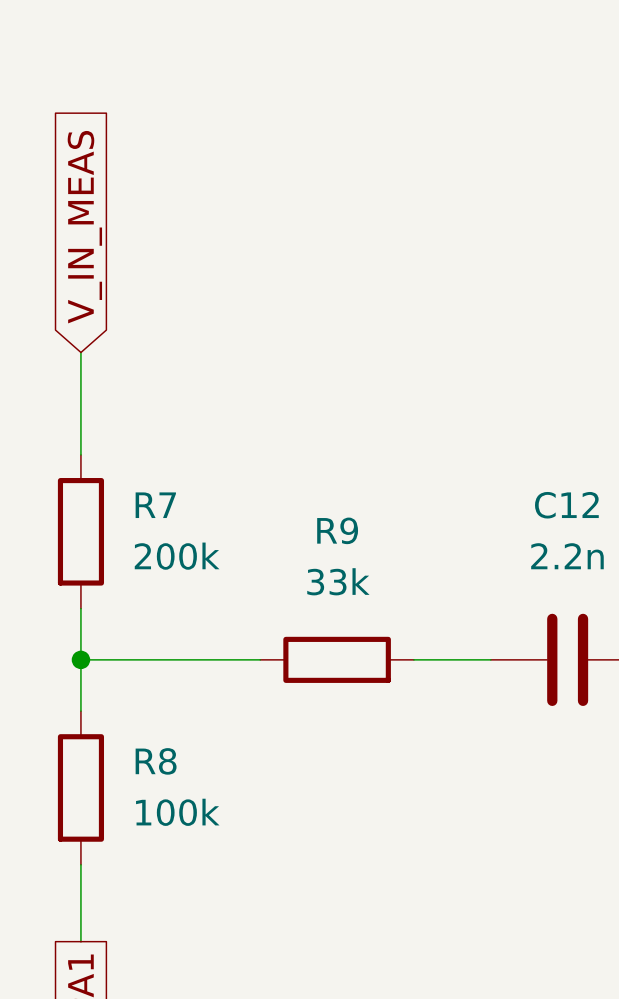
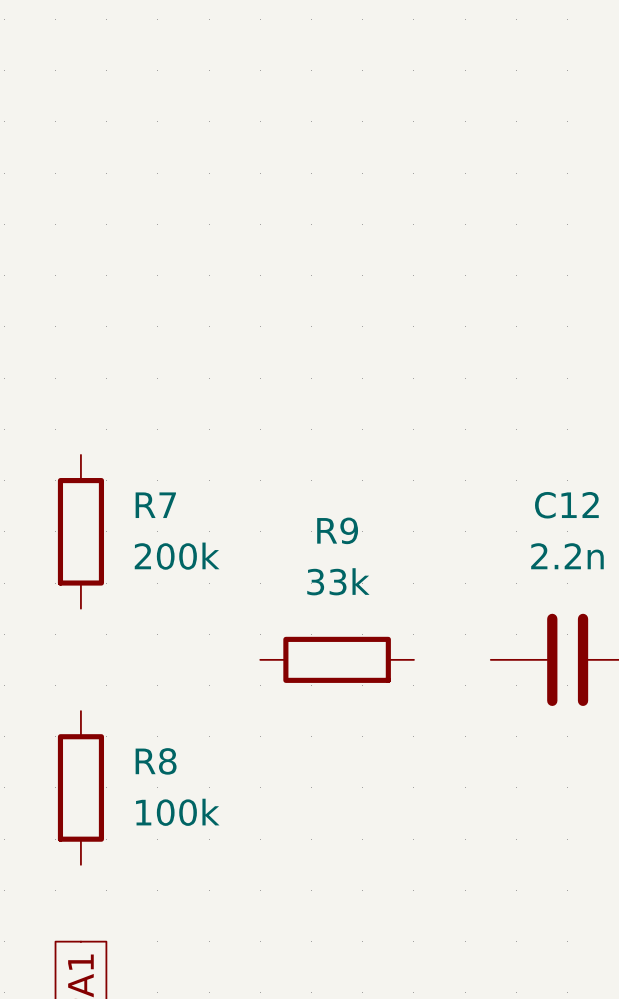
global label: V_IN_MEAS (84, 227) -> none
wire: (80, 352) (80, 454) -> none
wire: (80, 608) (80, 711) -> none
wire: (80, 659) (260, 659) -> none
junction: (80, 659) -> none
wire: (413, 659) (490, 659) -> none
wire: (80, 864) (80, 941) -> none

